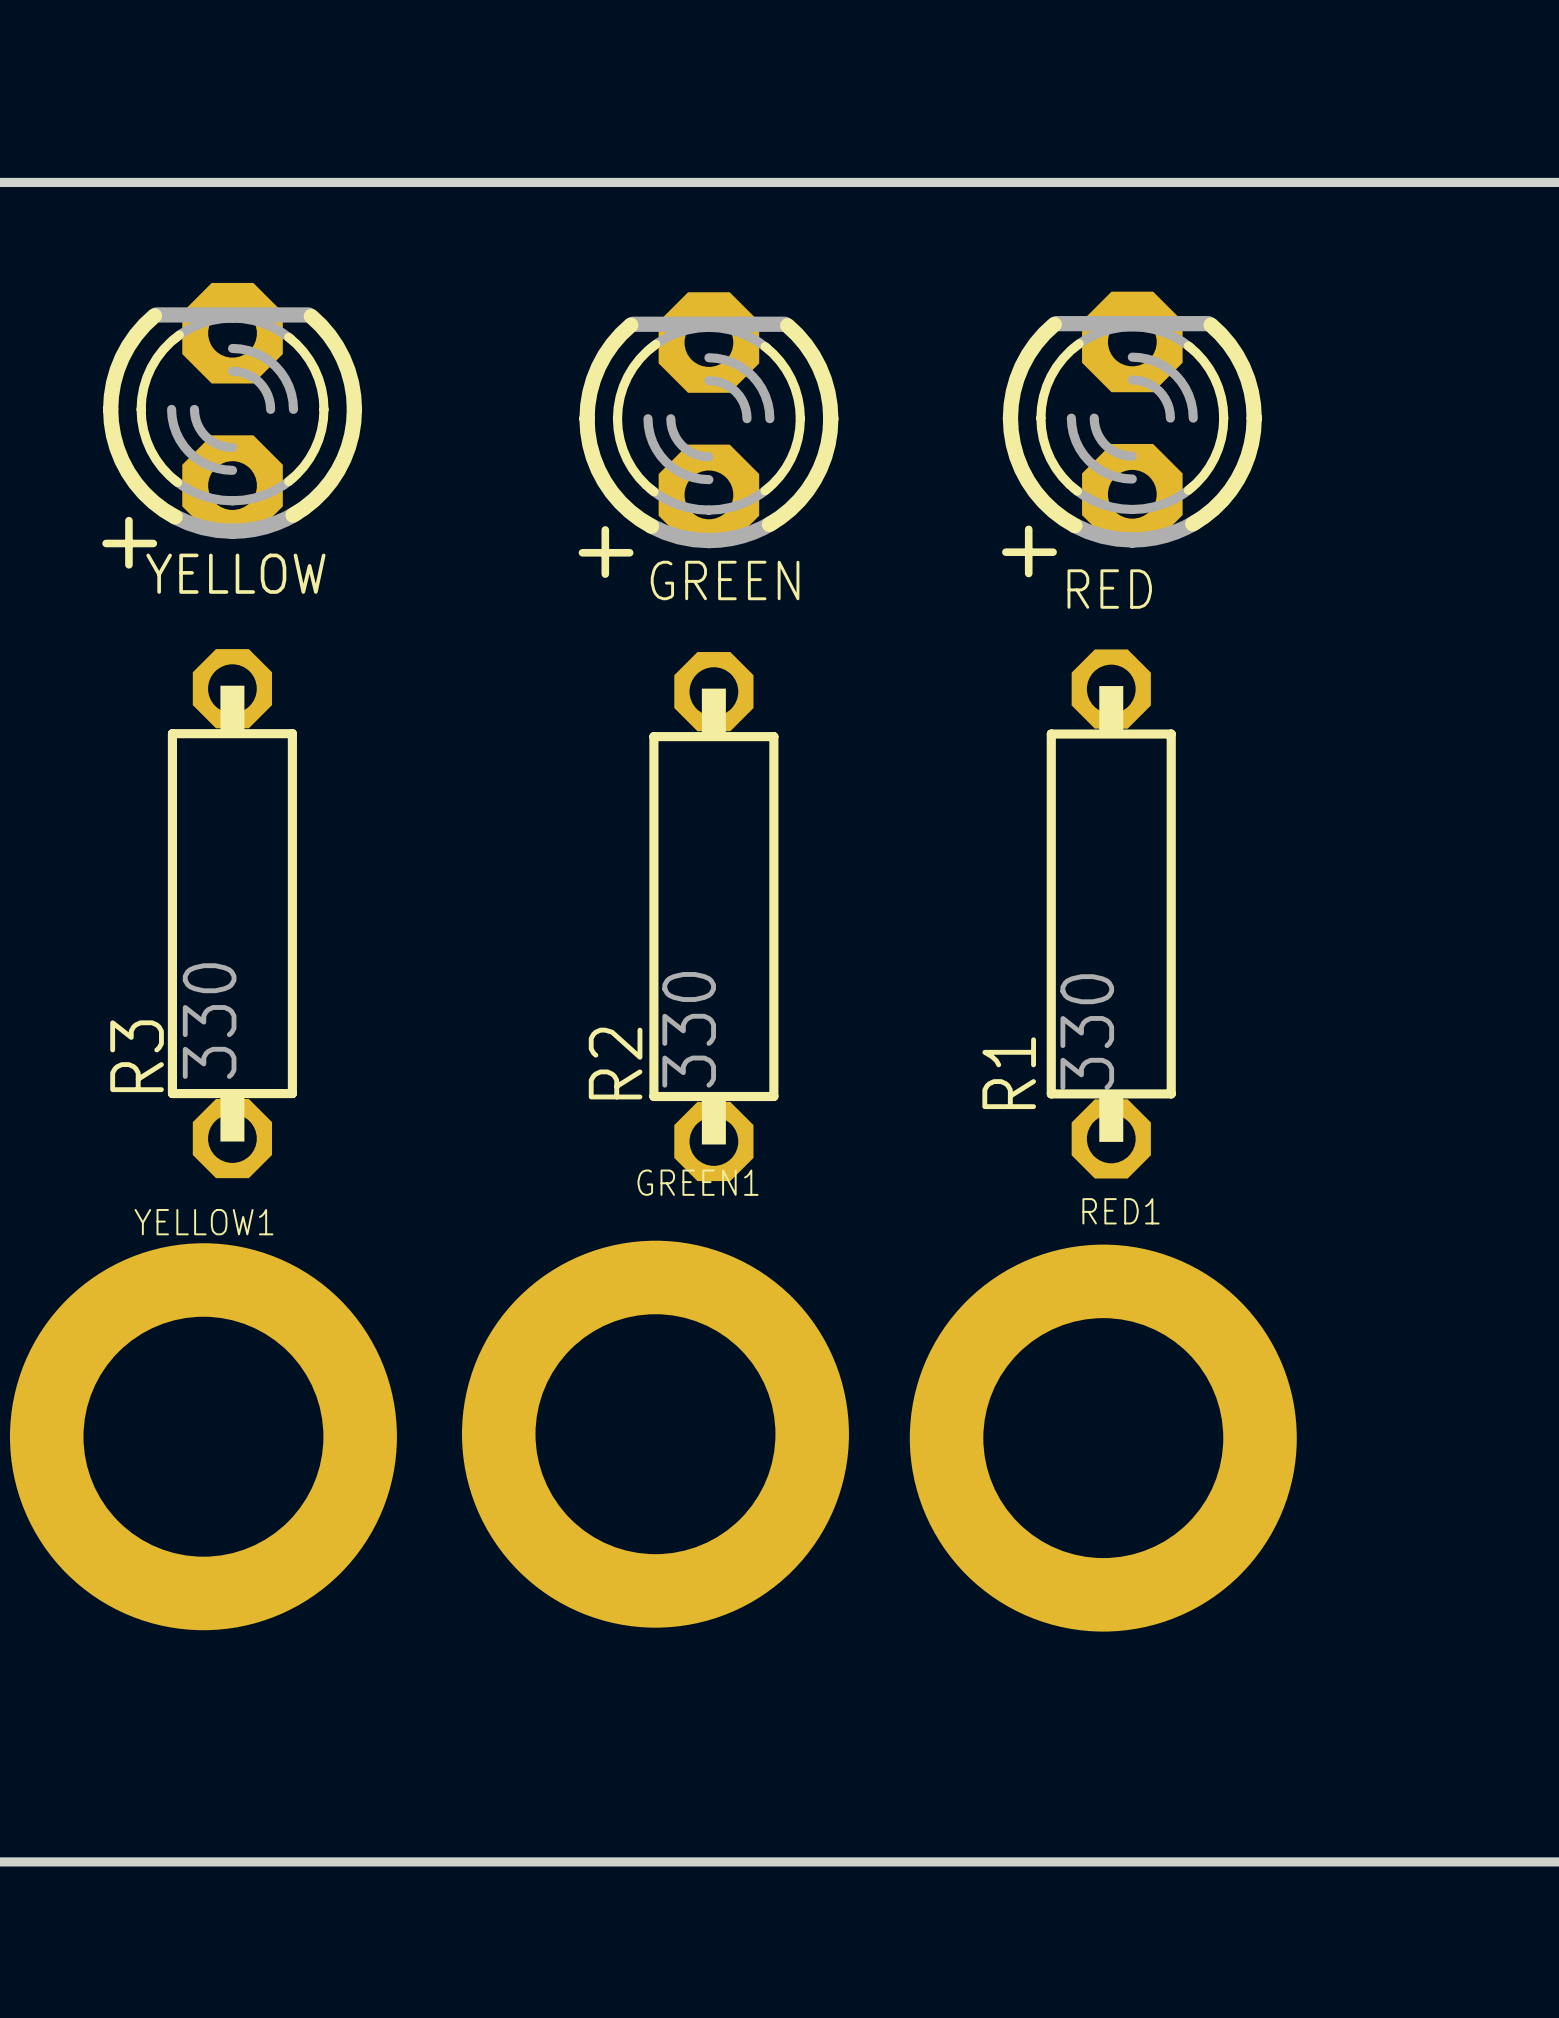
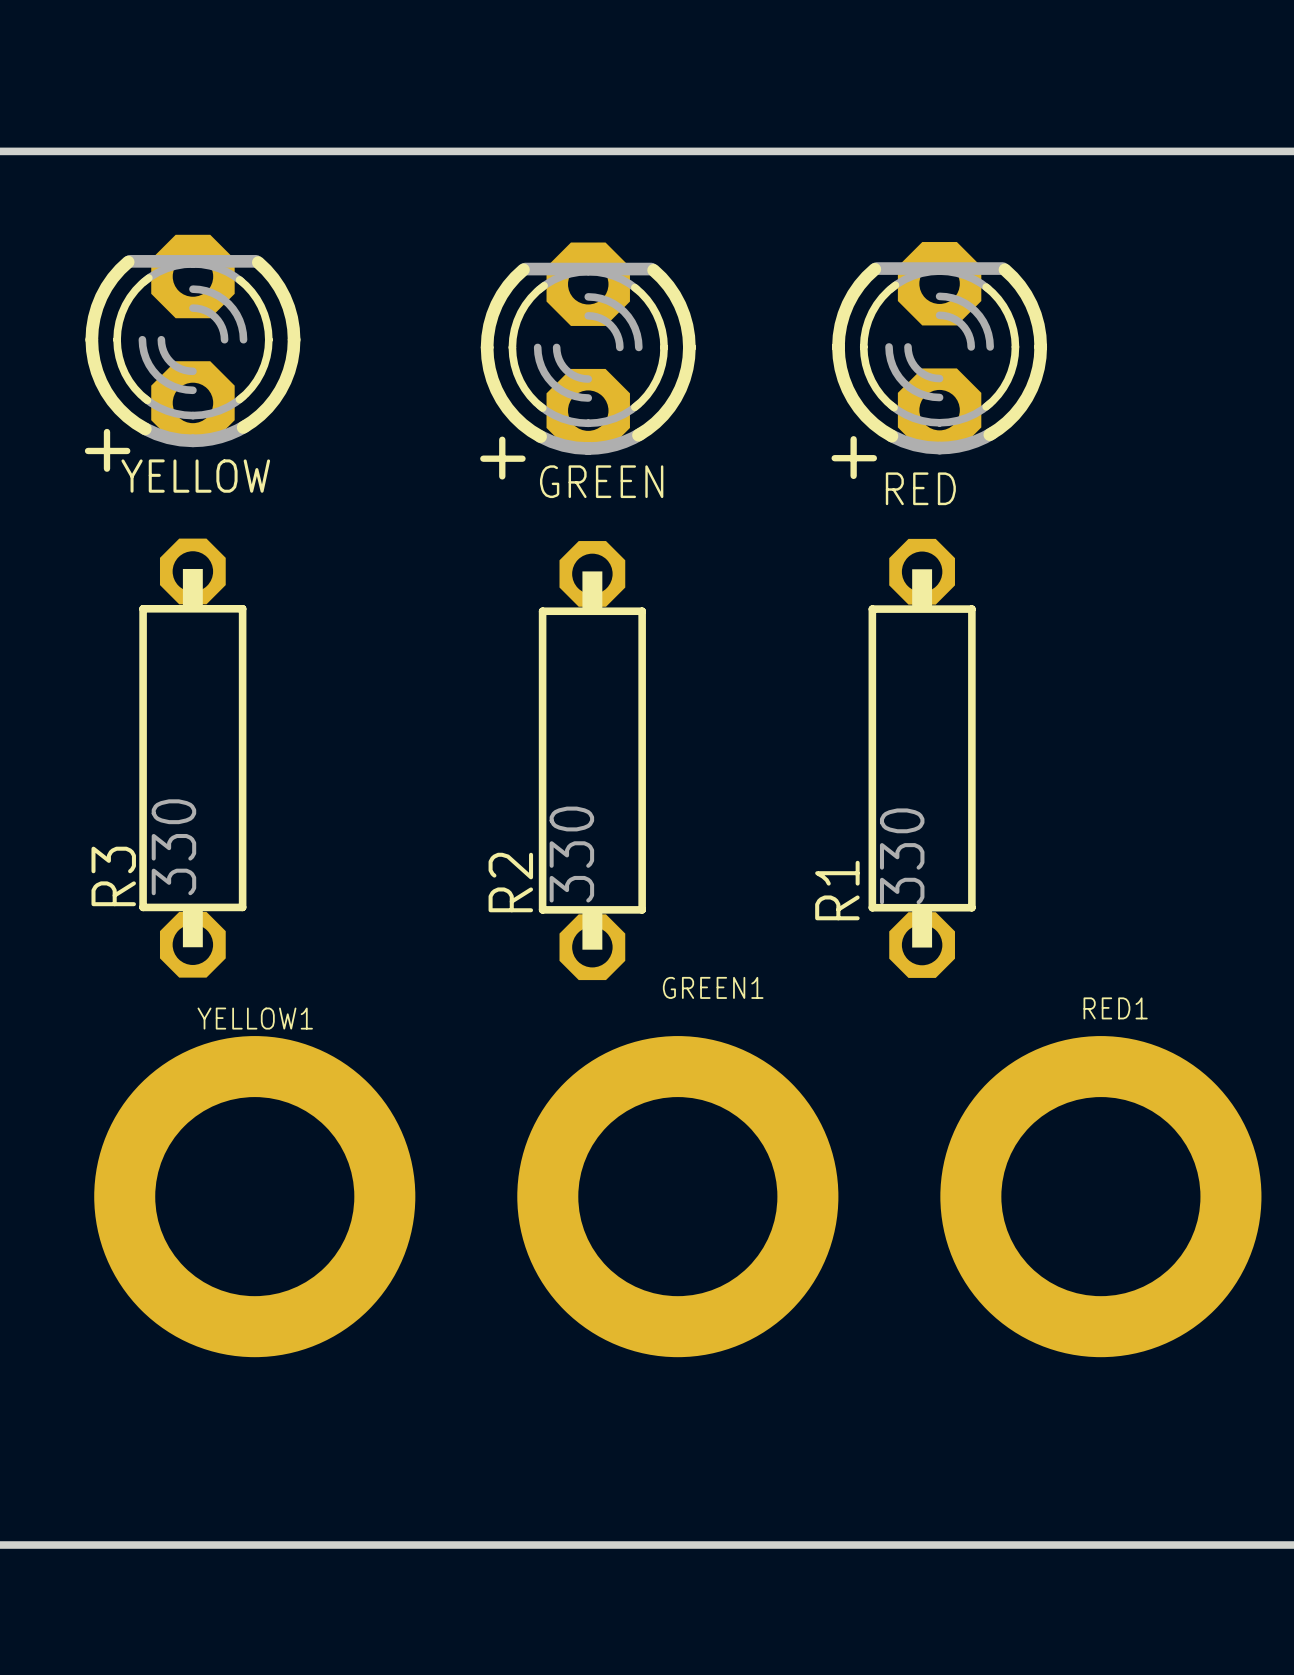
GREEN1 position: (655, 1434) -> (677, 1196)
YELLOW1 position: (203, 1436) -> (254, 1196)
RED1 position: (1103, 1438) -> (1100, 1196)

